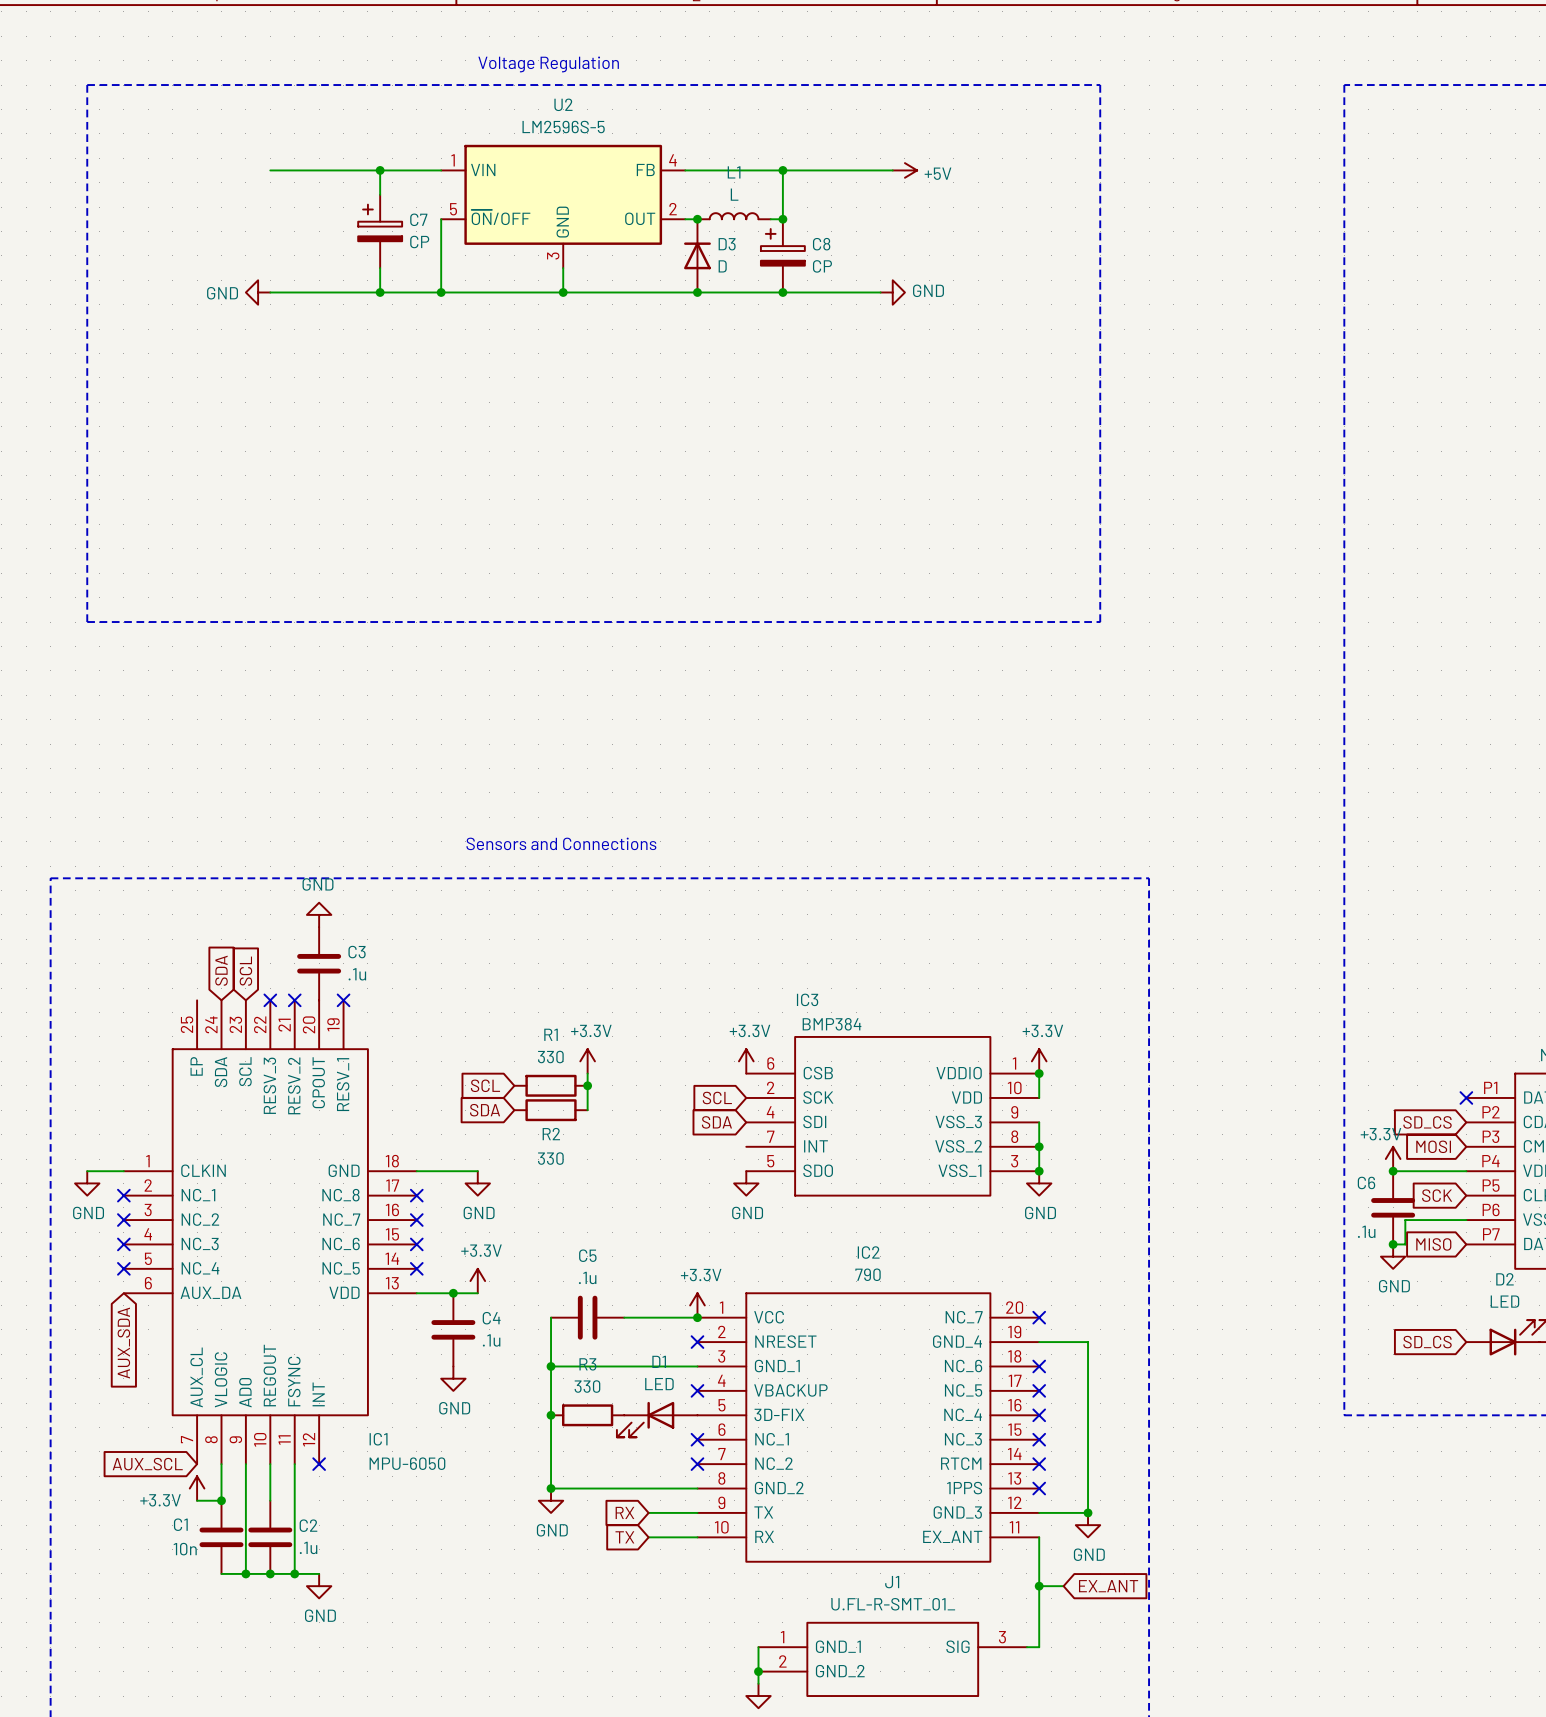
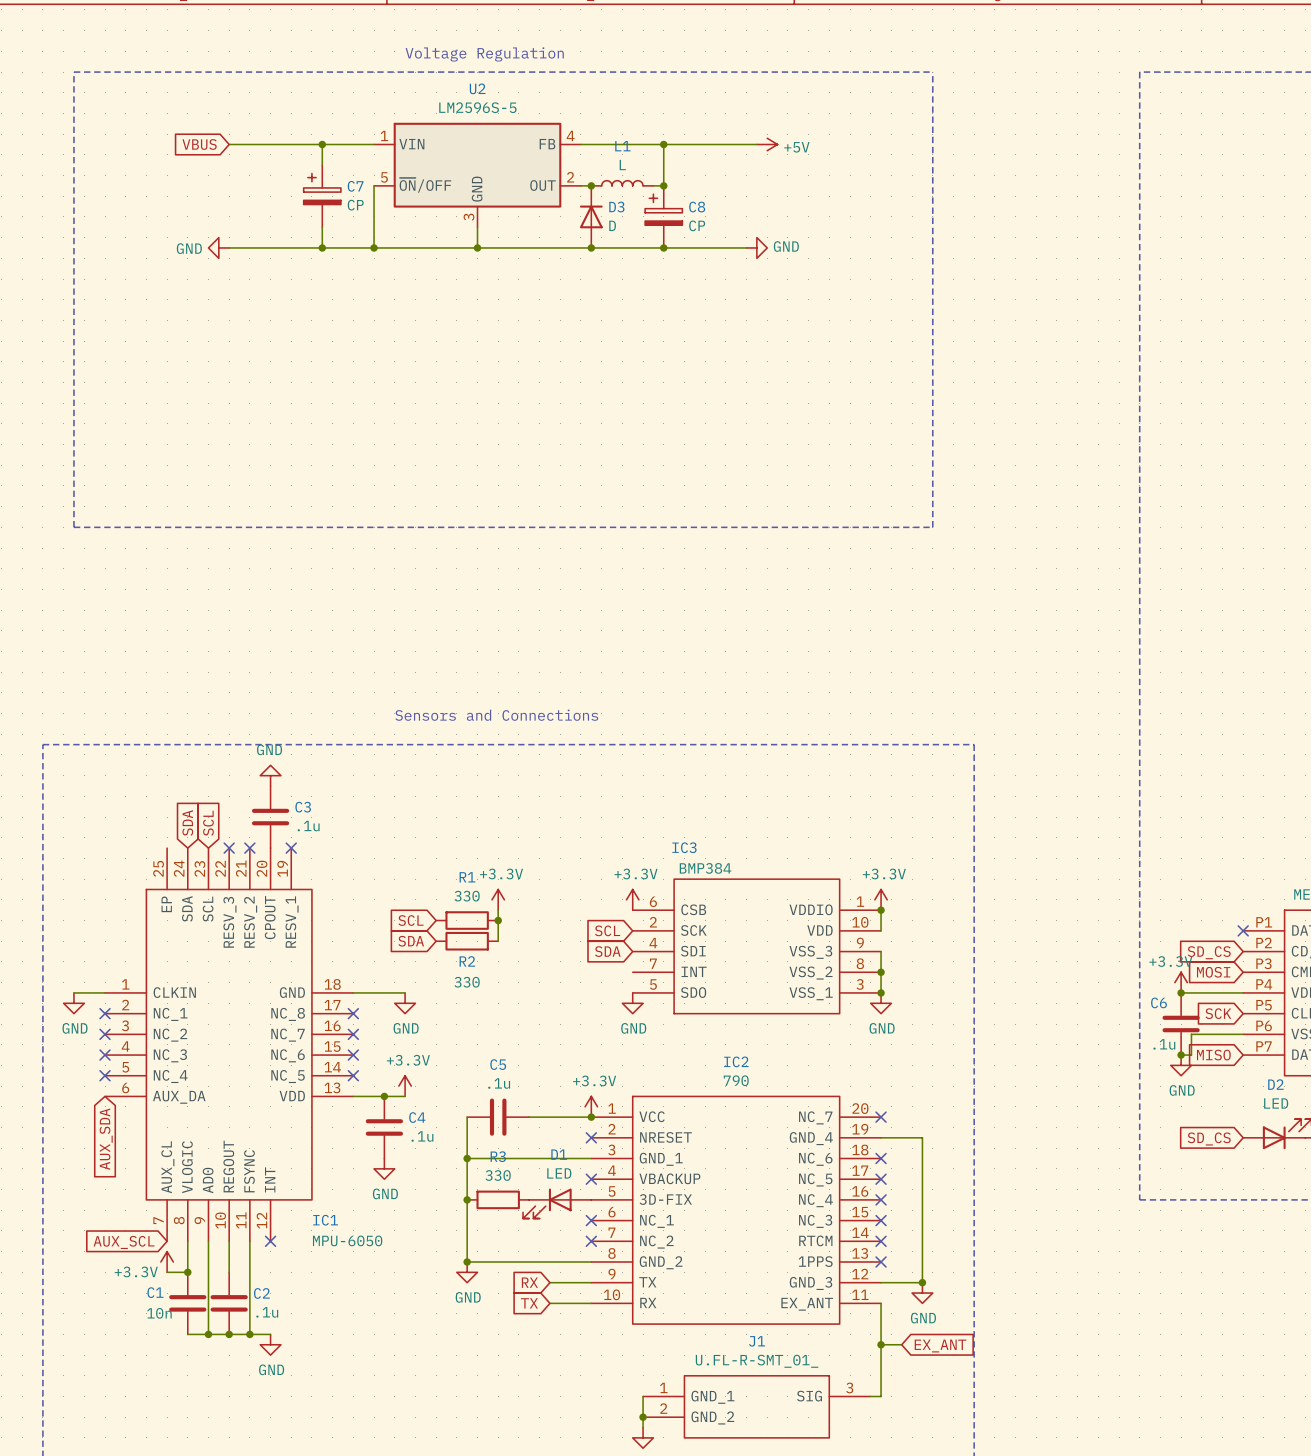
global label: none -> VBUS (199, 144)

